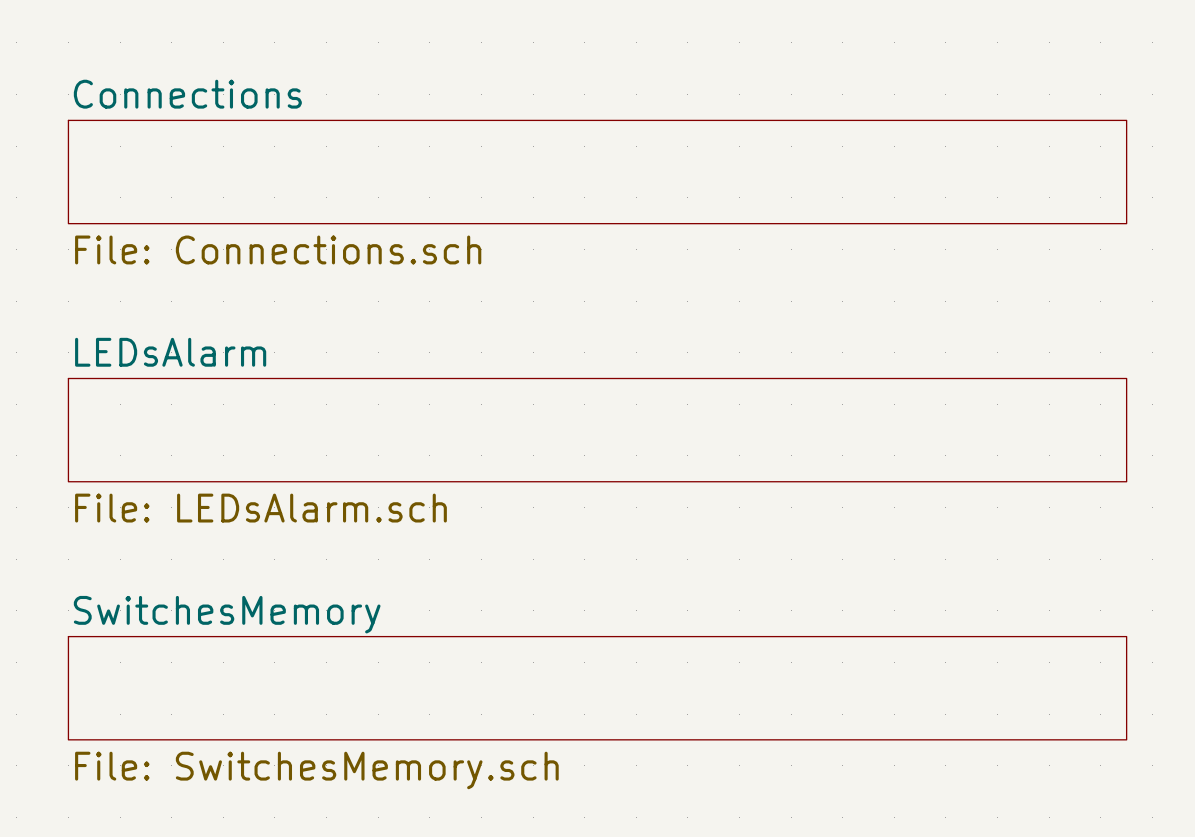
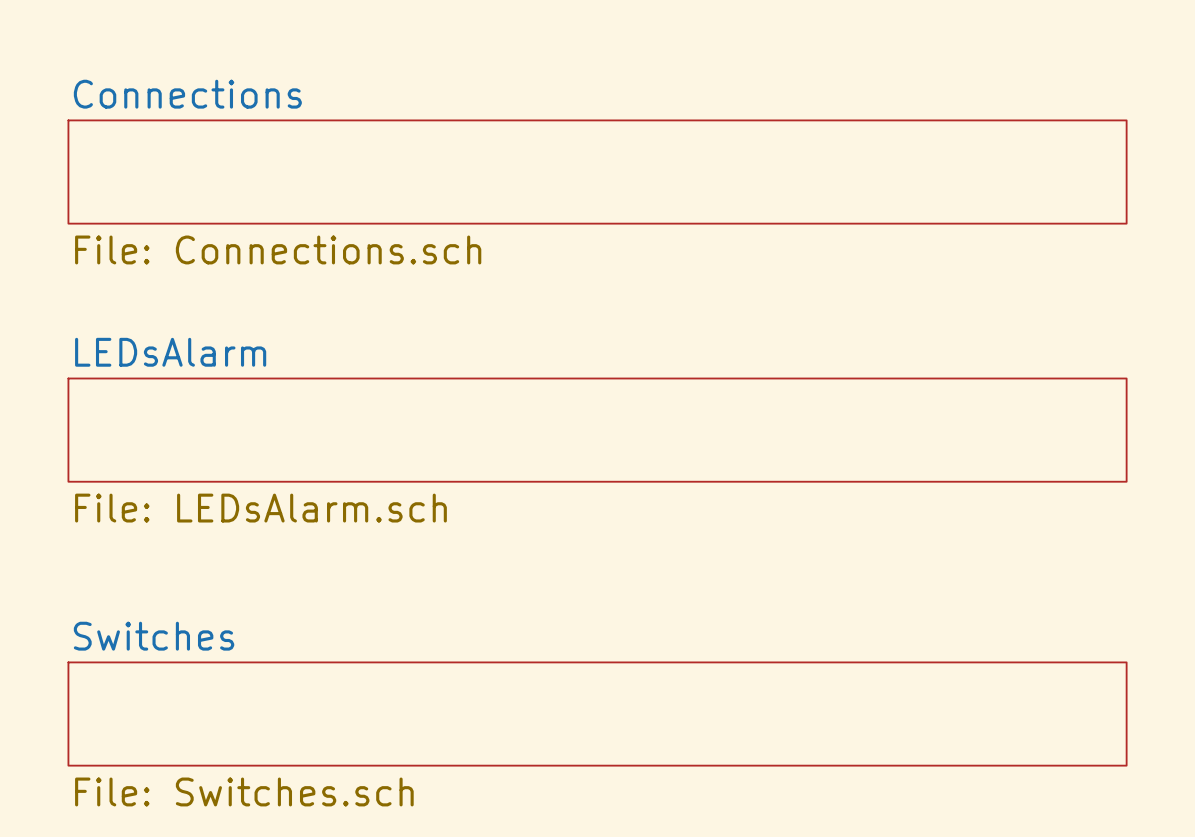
sheet SwitchesMemory: File: SwitchesMemory.sch (597, 688) -> none
sheet Switches: none -> File: Switches.sch (597, 714)

